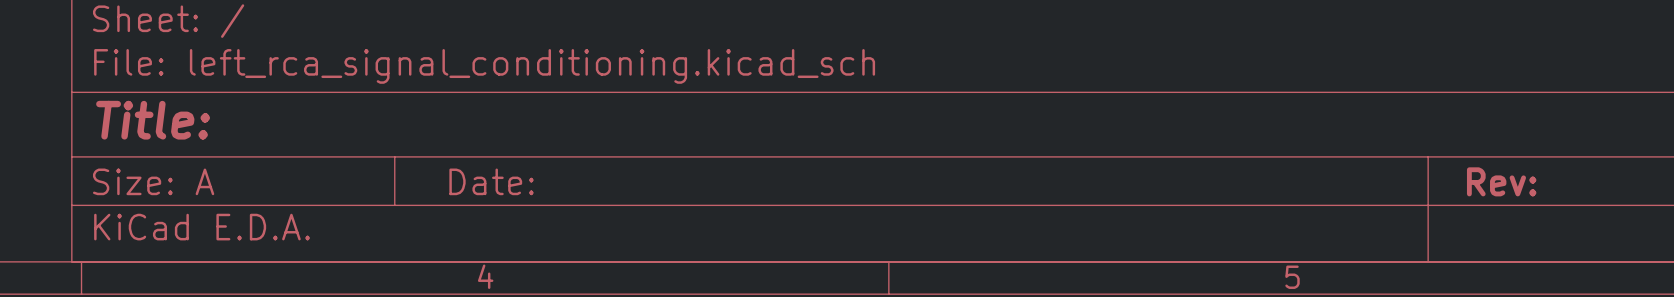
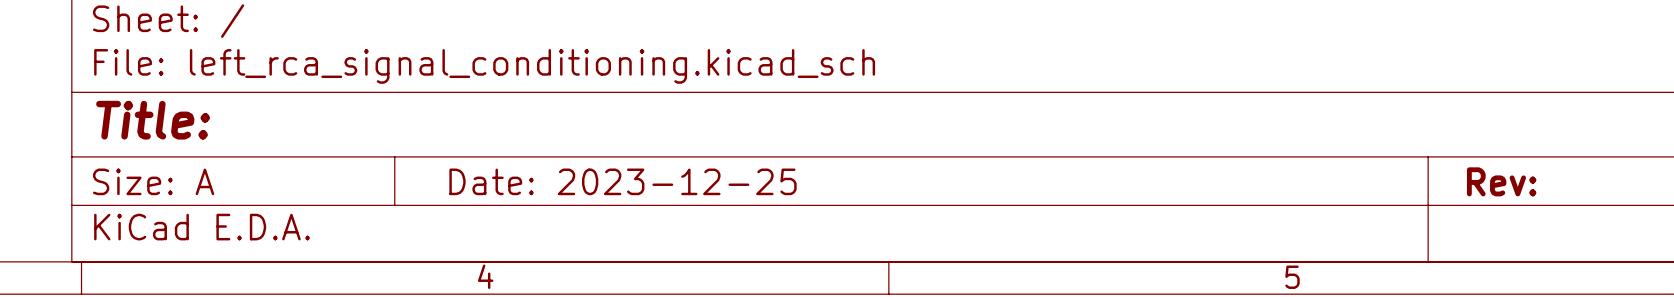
title block: Date: (491, 181) -> Date: 2023-12-25 (623, 181)

